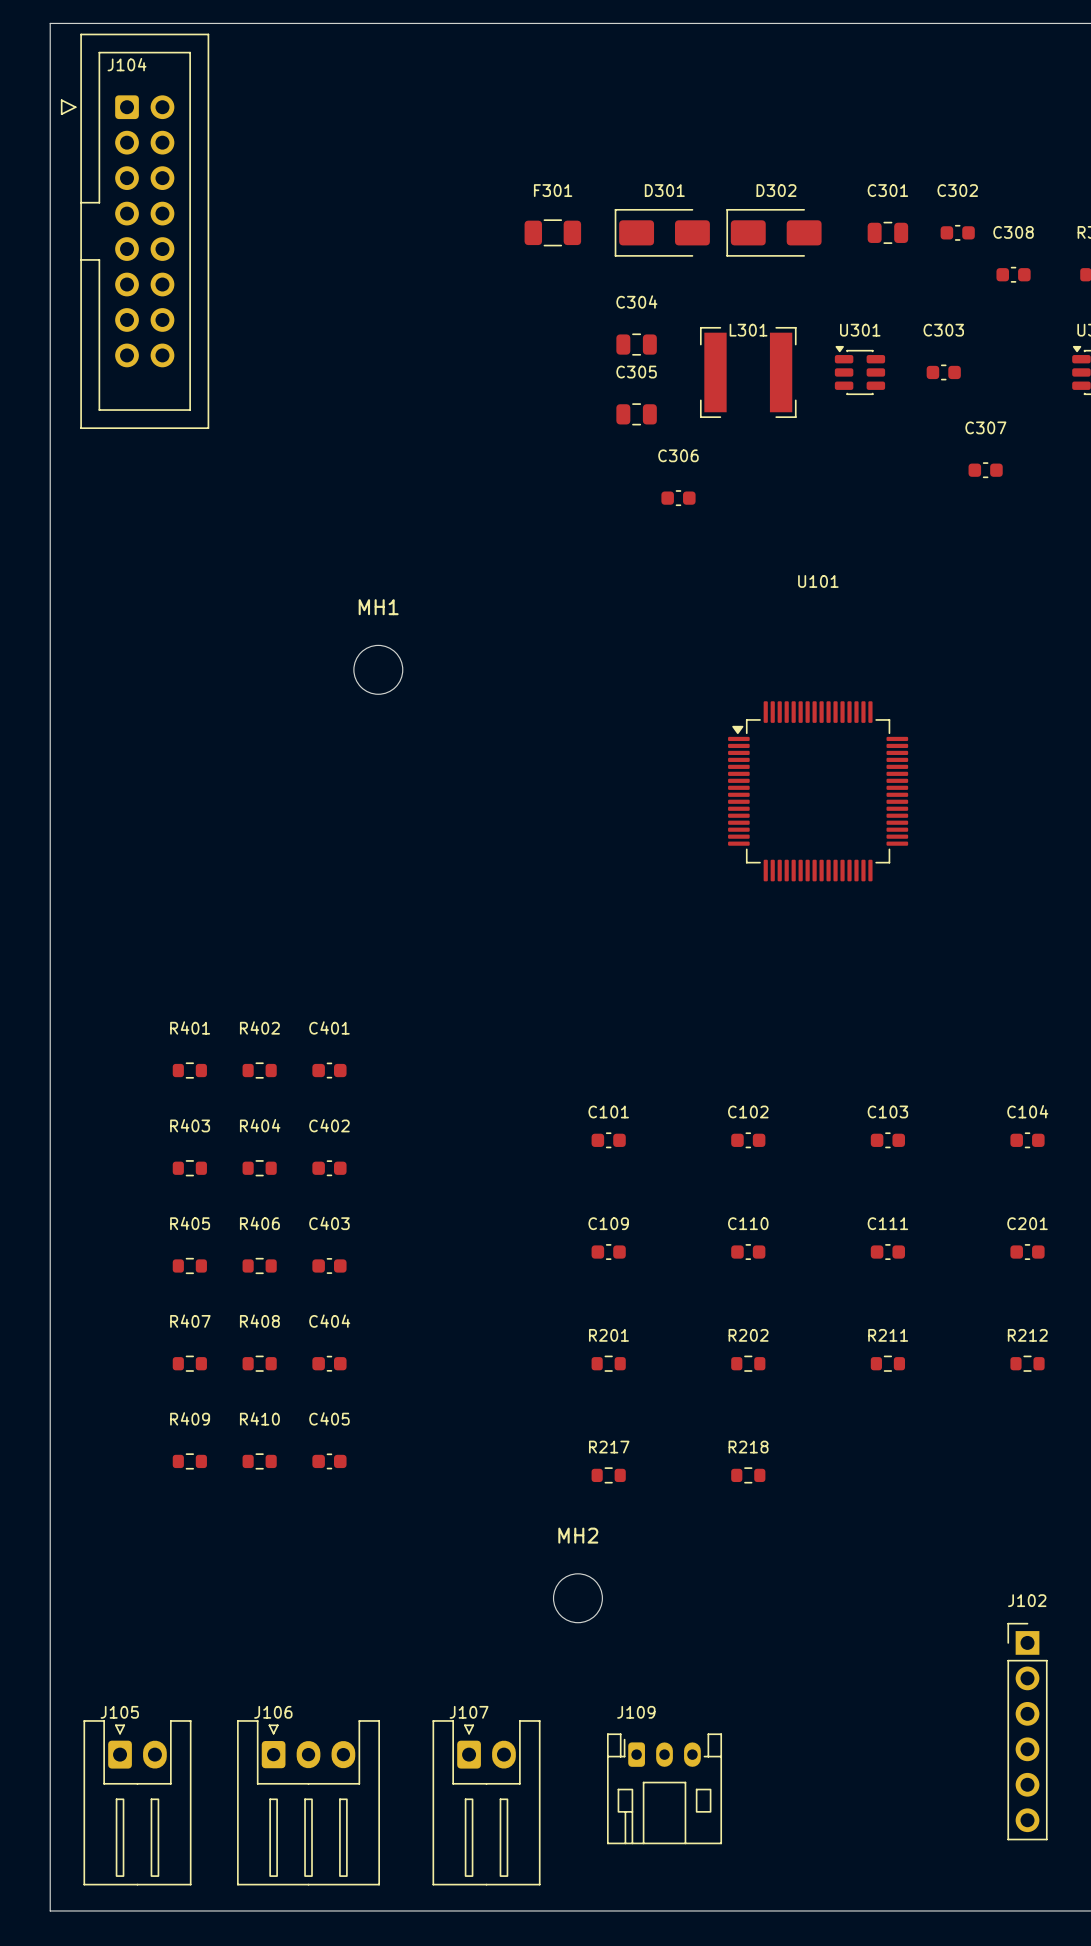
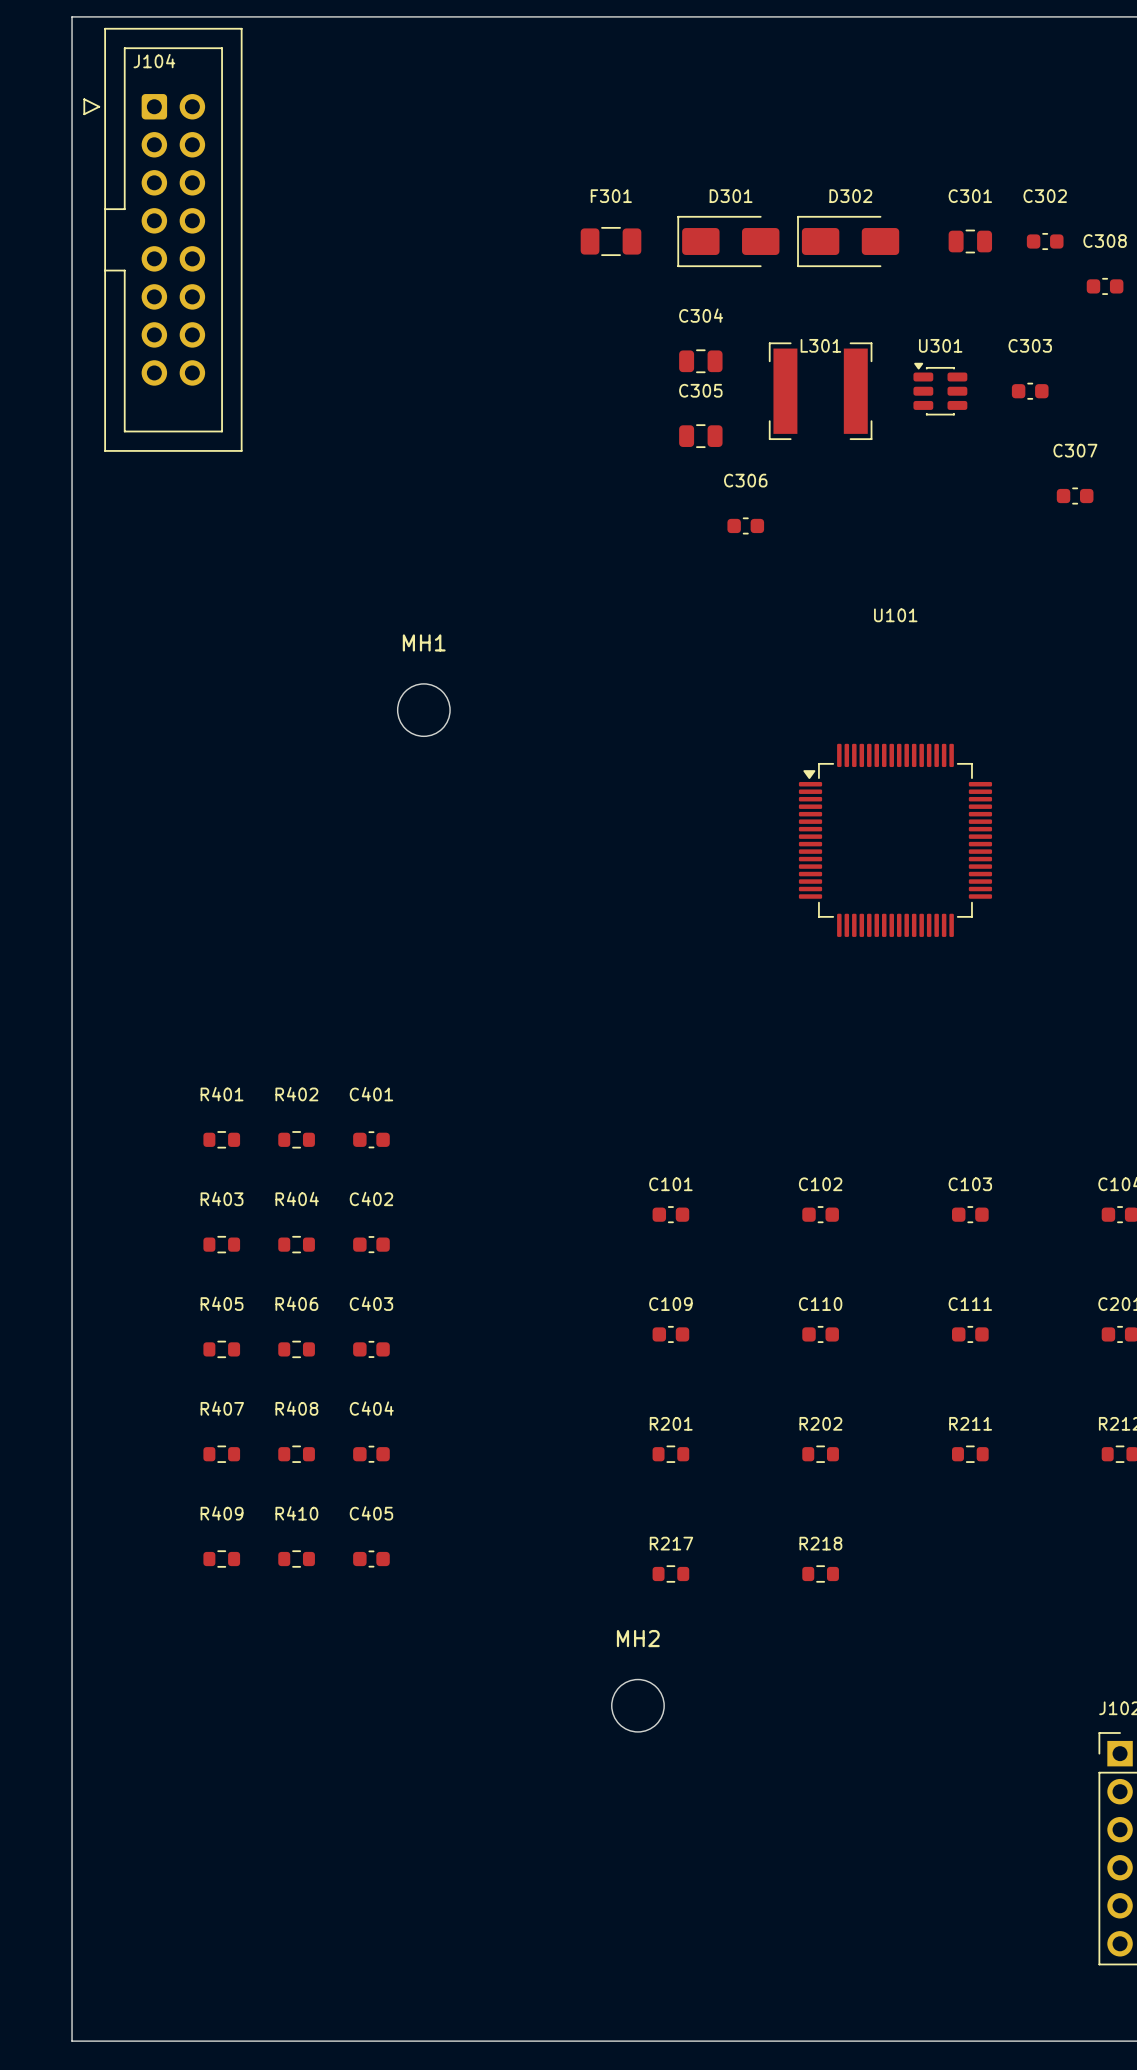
J109: (664, 1788) -> none
J105: (137, 1802) -> none
J106: (308, 1802) -> none
J107: (486, 1802) -> none

